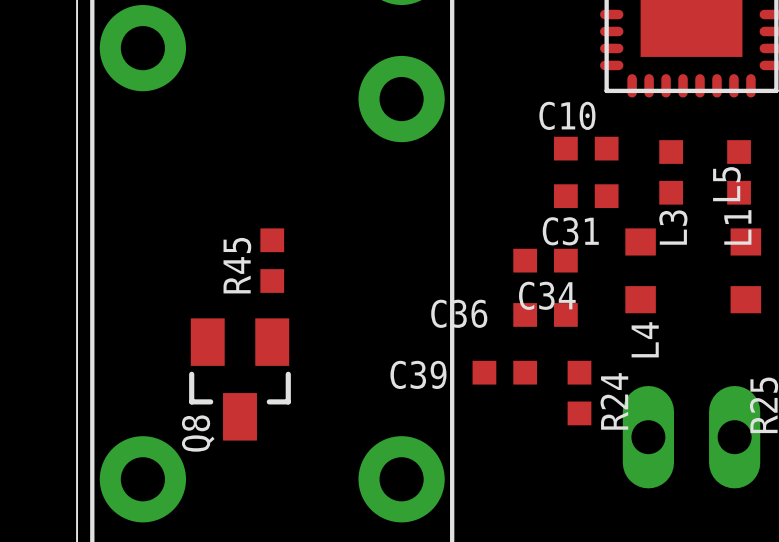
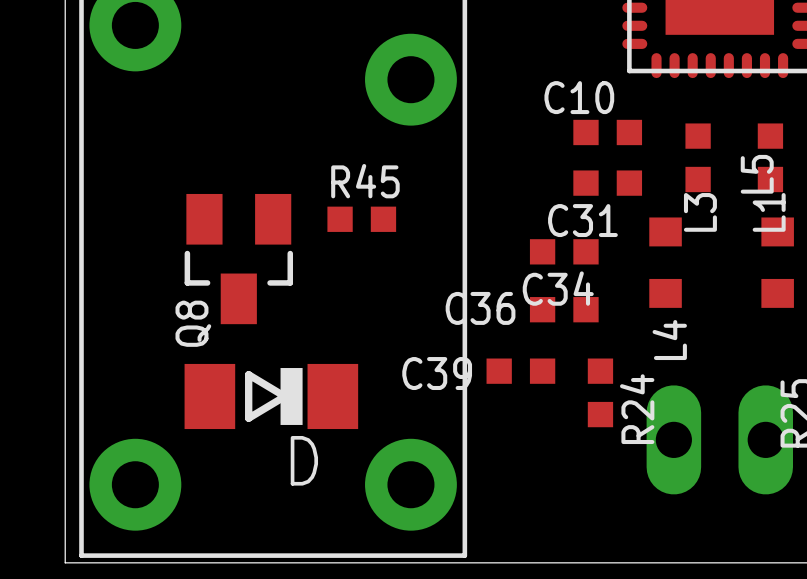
R45 rotation: 0° (272, 260) -> 90° clockwise (361, 219)
R45 position: (272, 260) -> (361, 219)
Q8 position: (239, 379) -> (238, 259)
D: none -> (271, 396)

